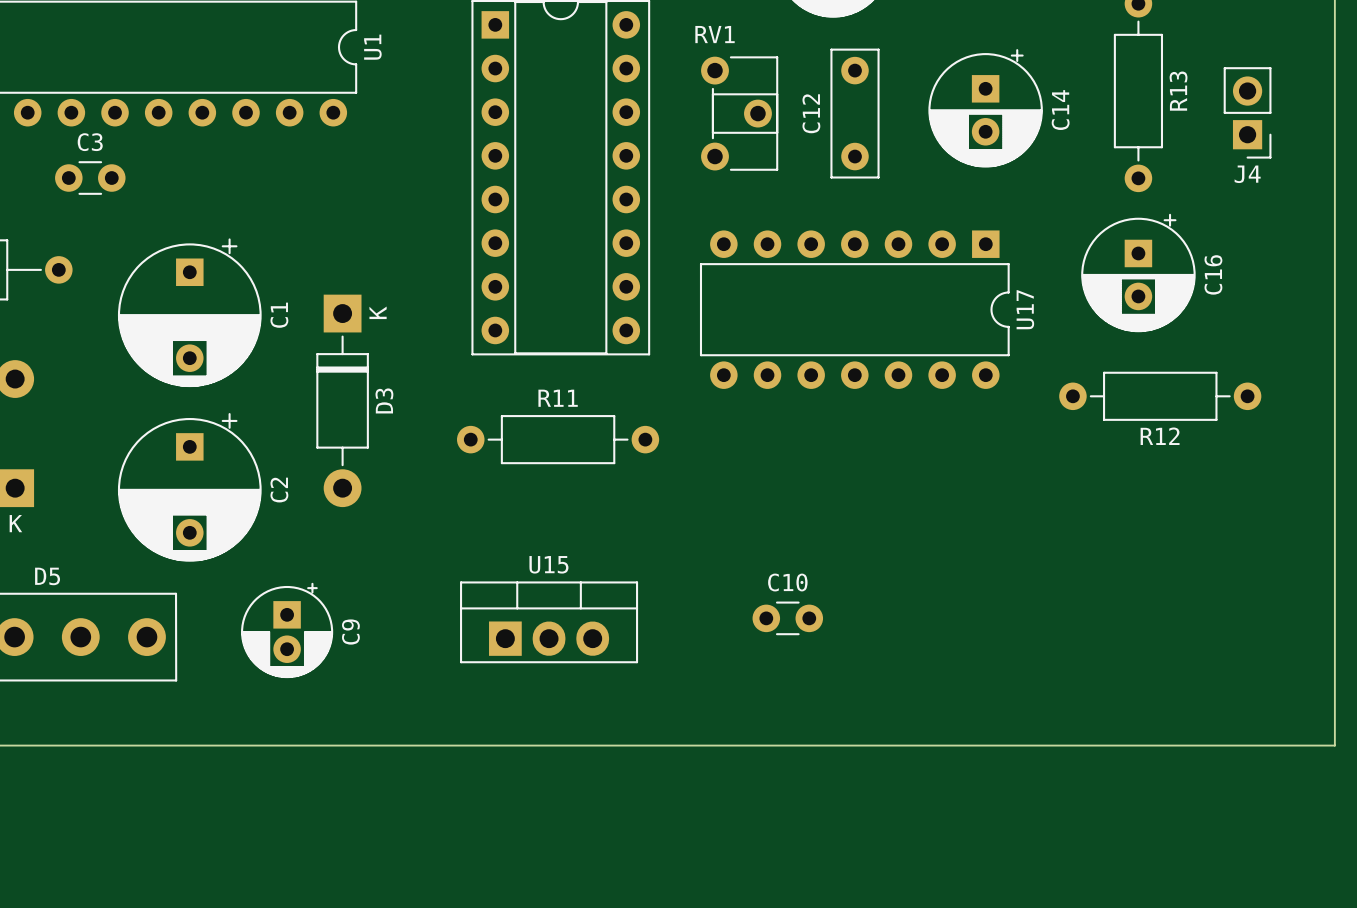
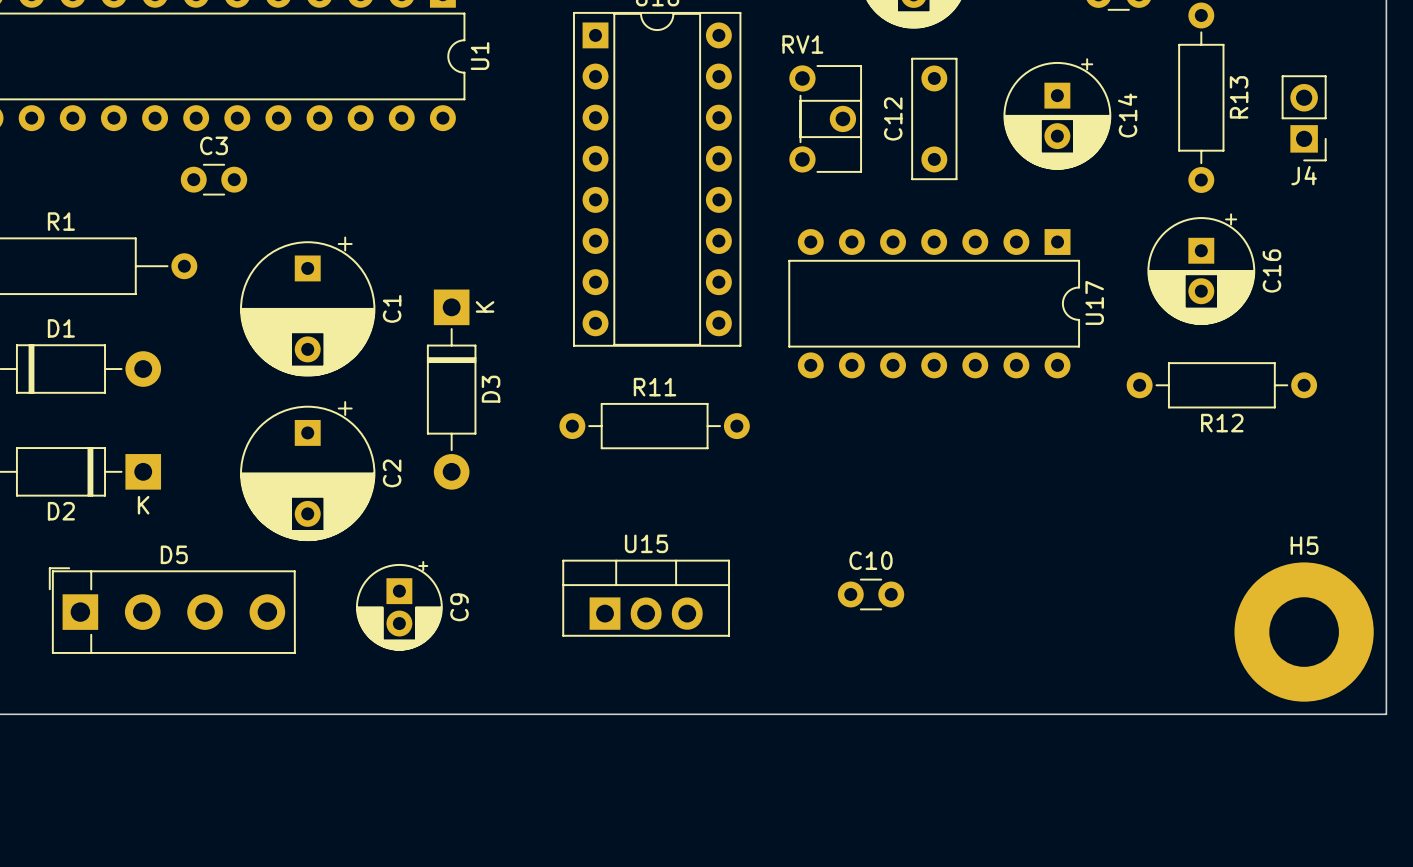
H5: none -> (1304, 632)

